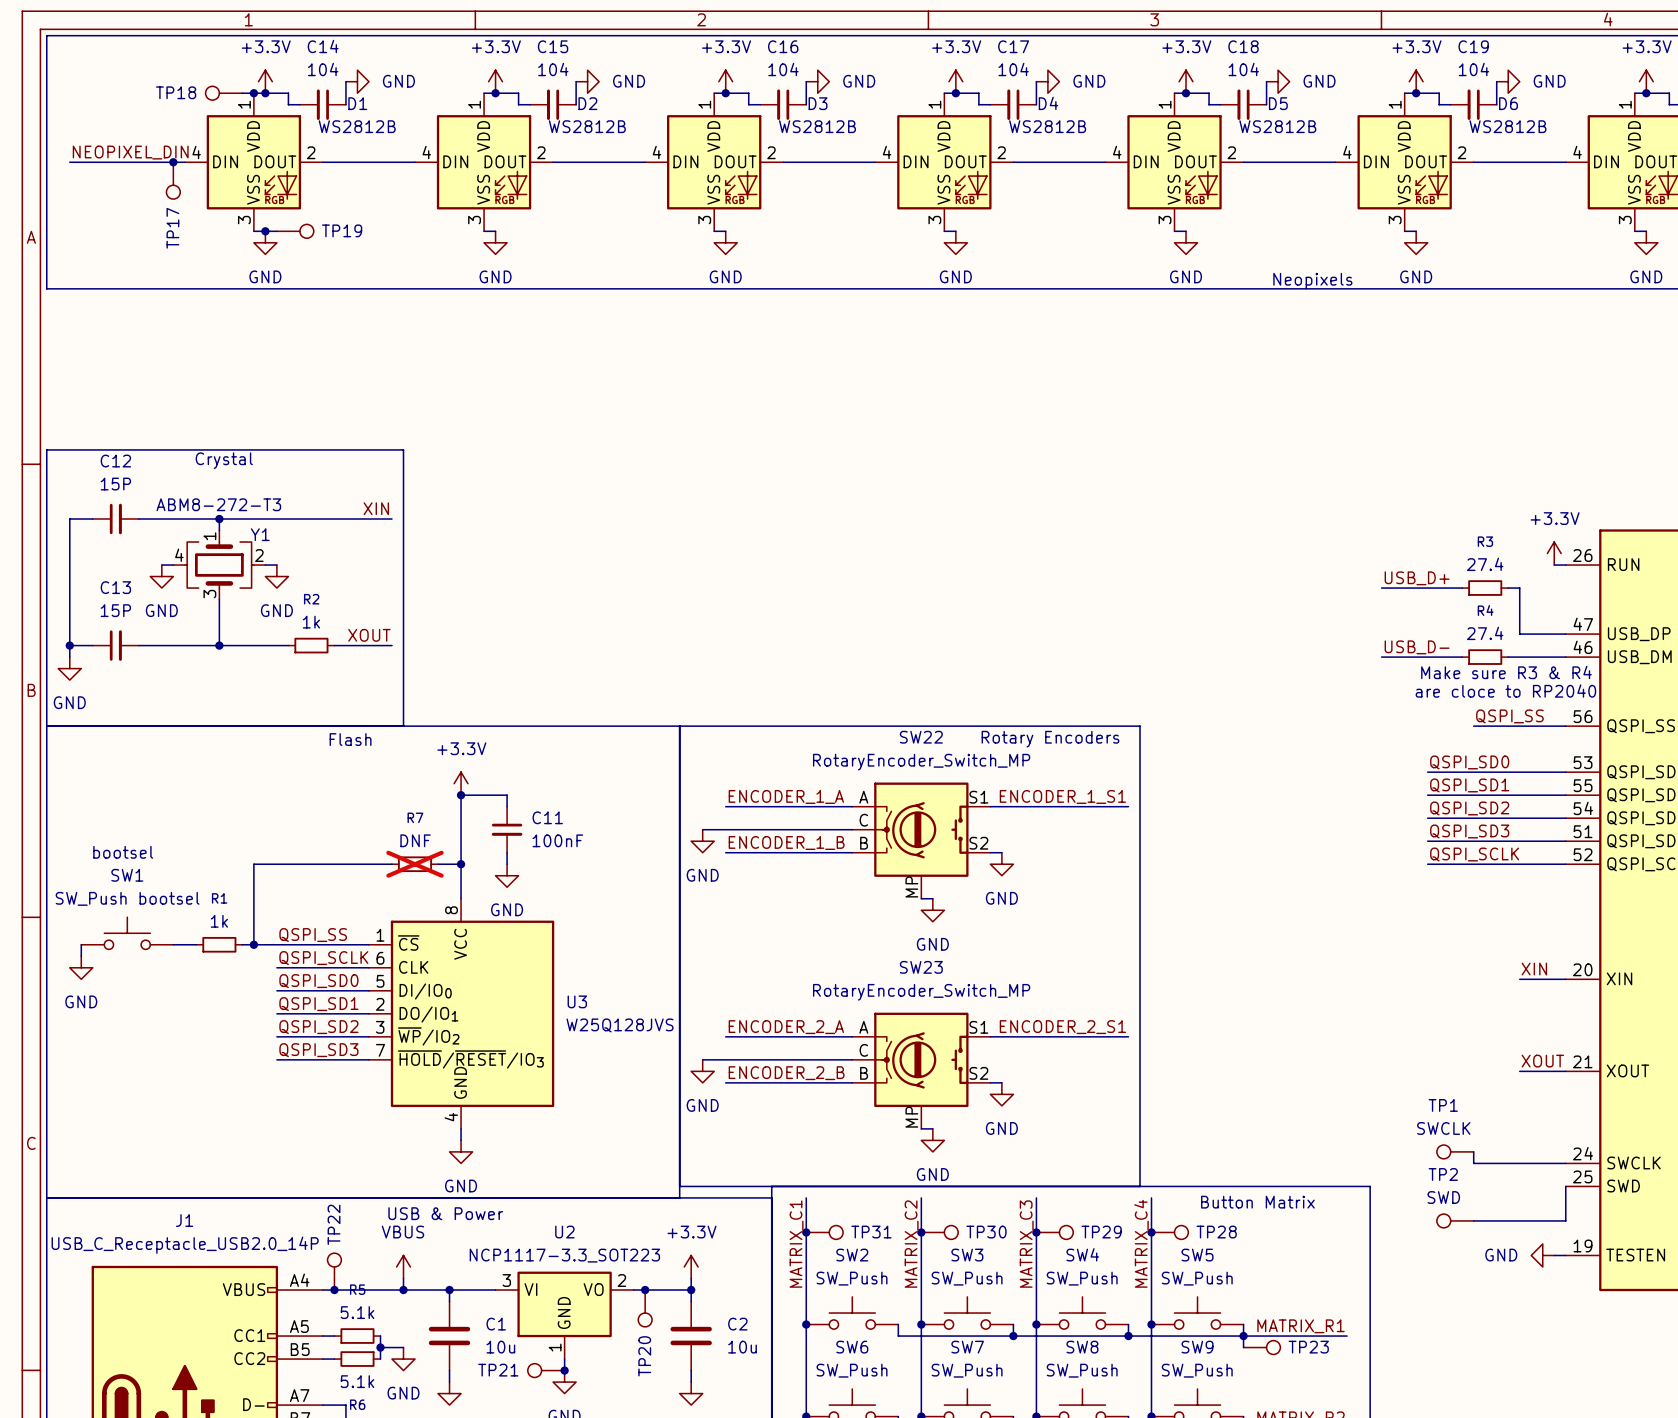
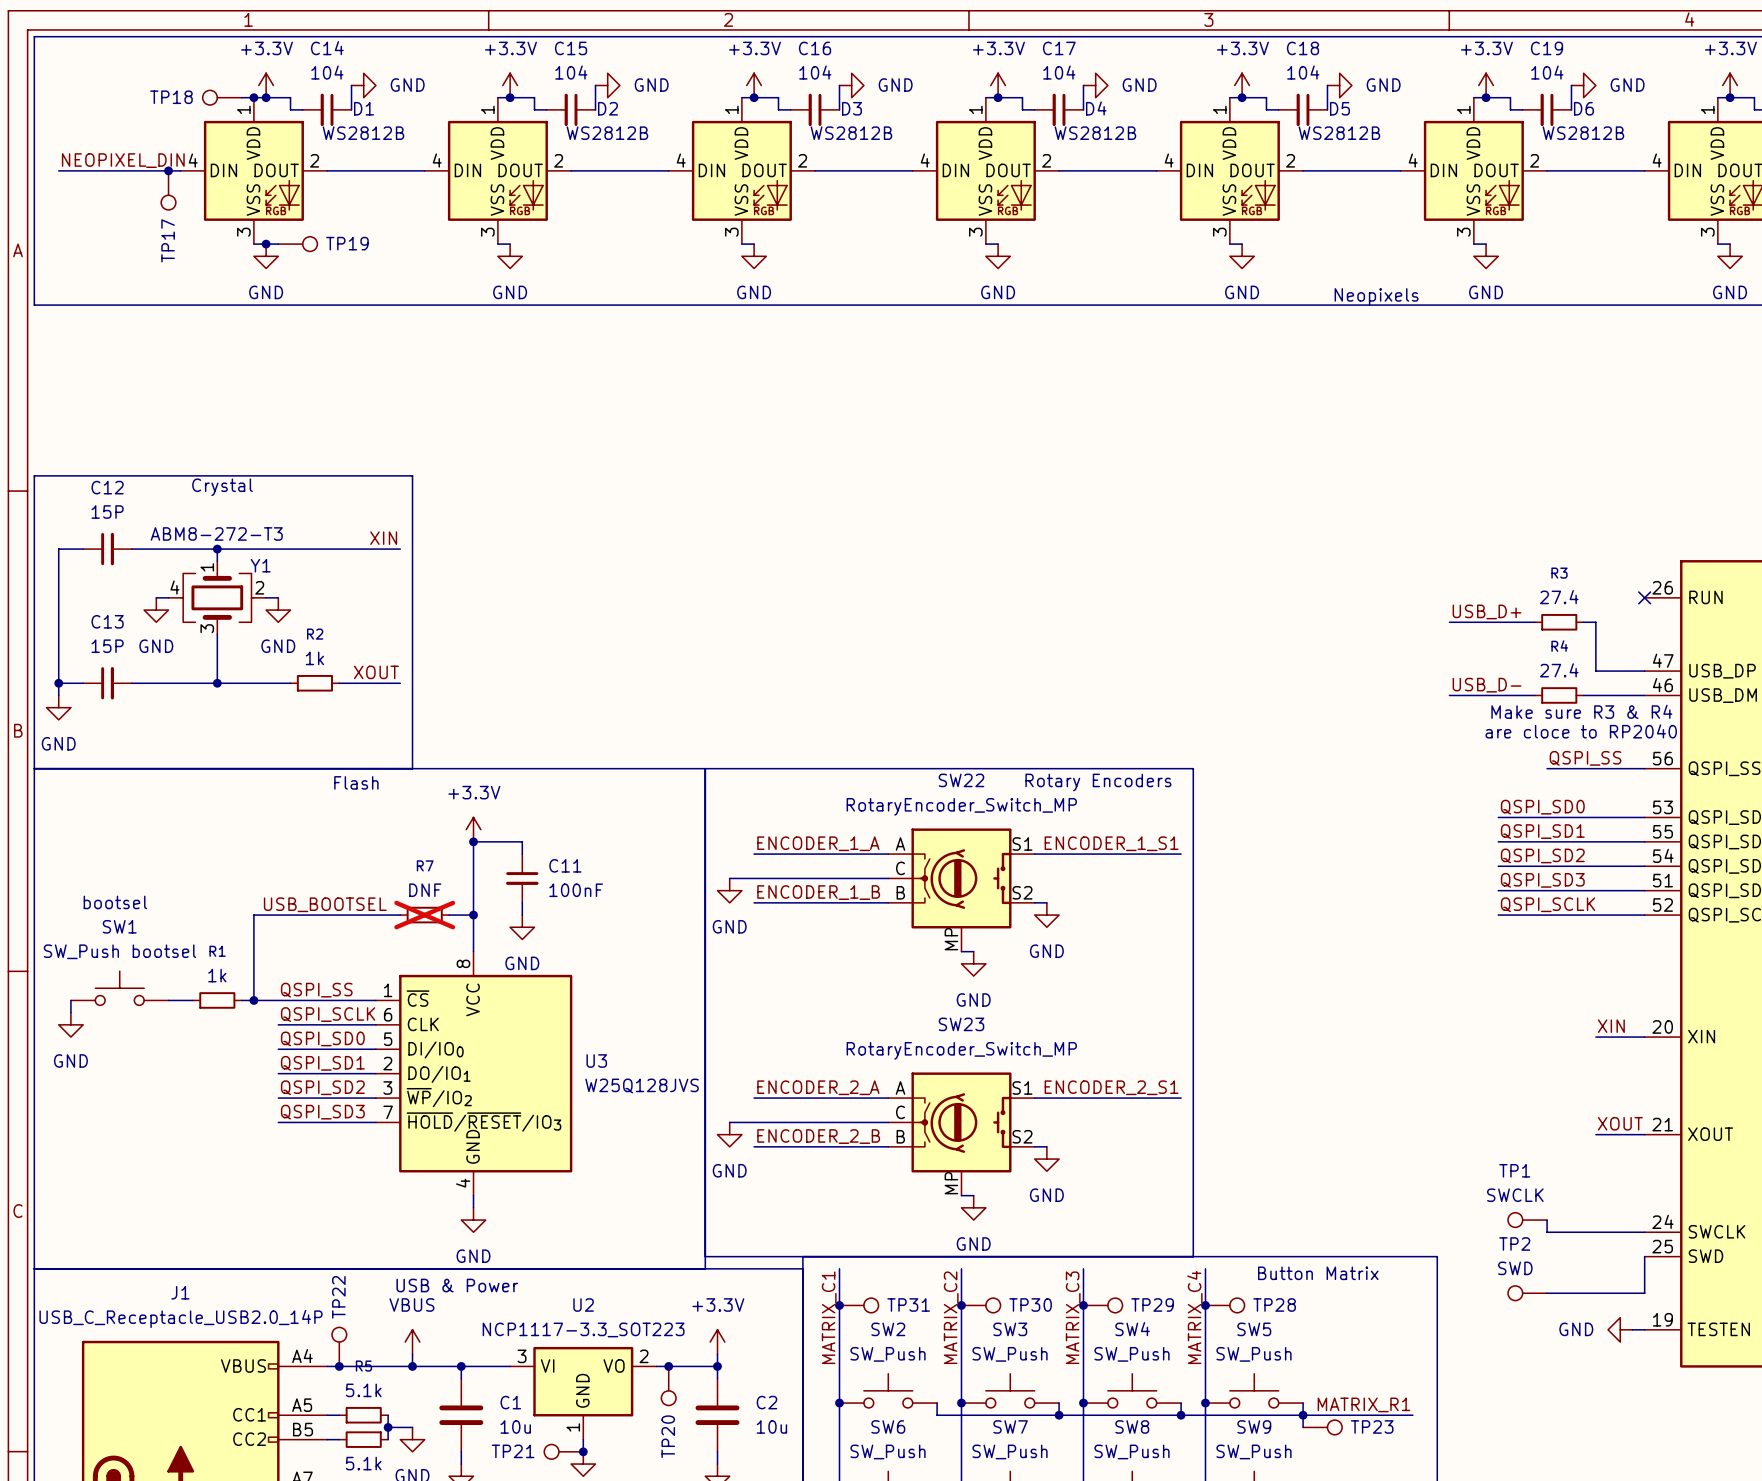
power symbol: +3.3V (1554, 553) -> none
wire: (1554, 565) (1565, 565) -> none
no-connect mark: none -> (1644, 597)
label: none -> USB_BOOTSEL (325, 904)

